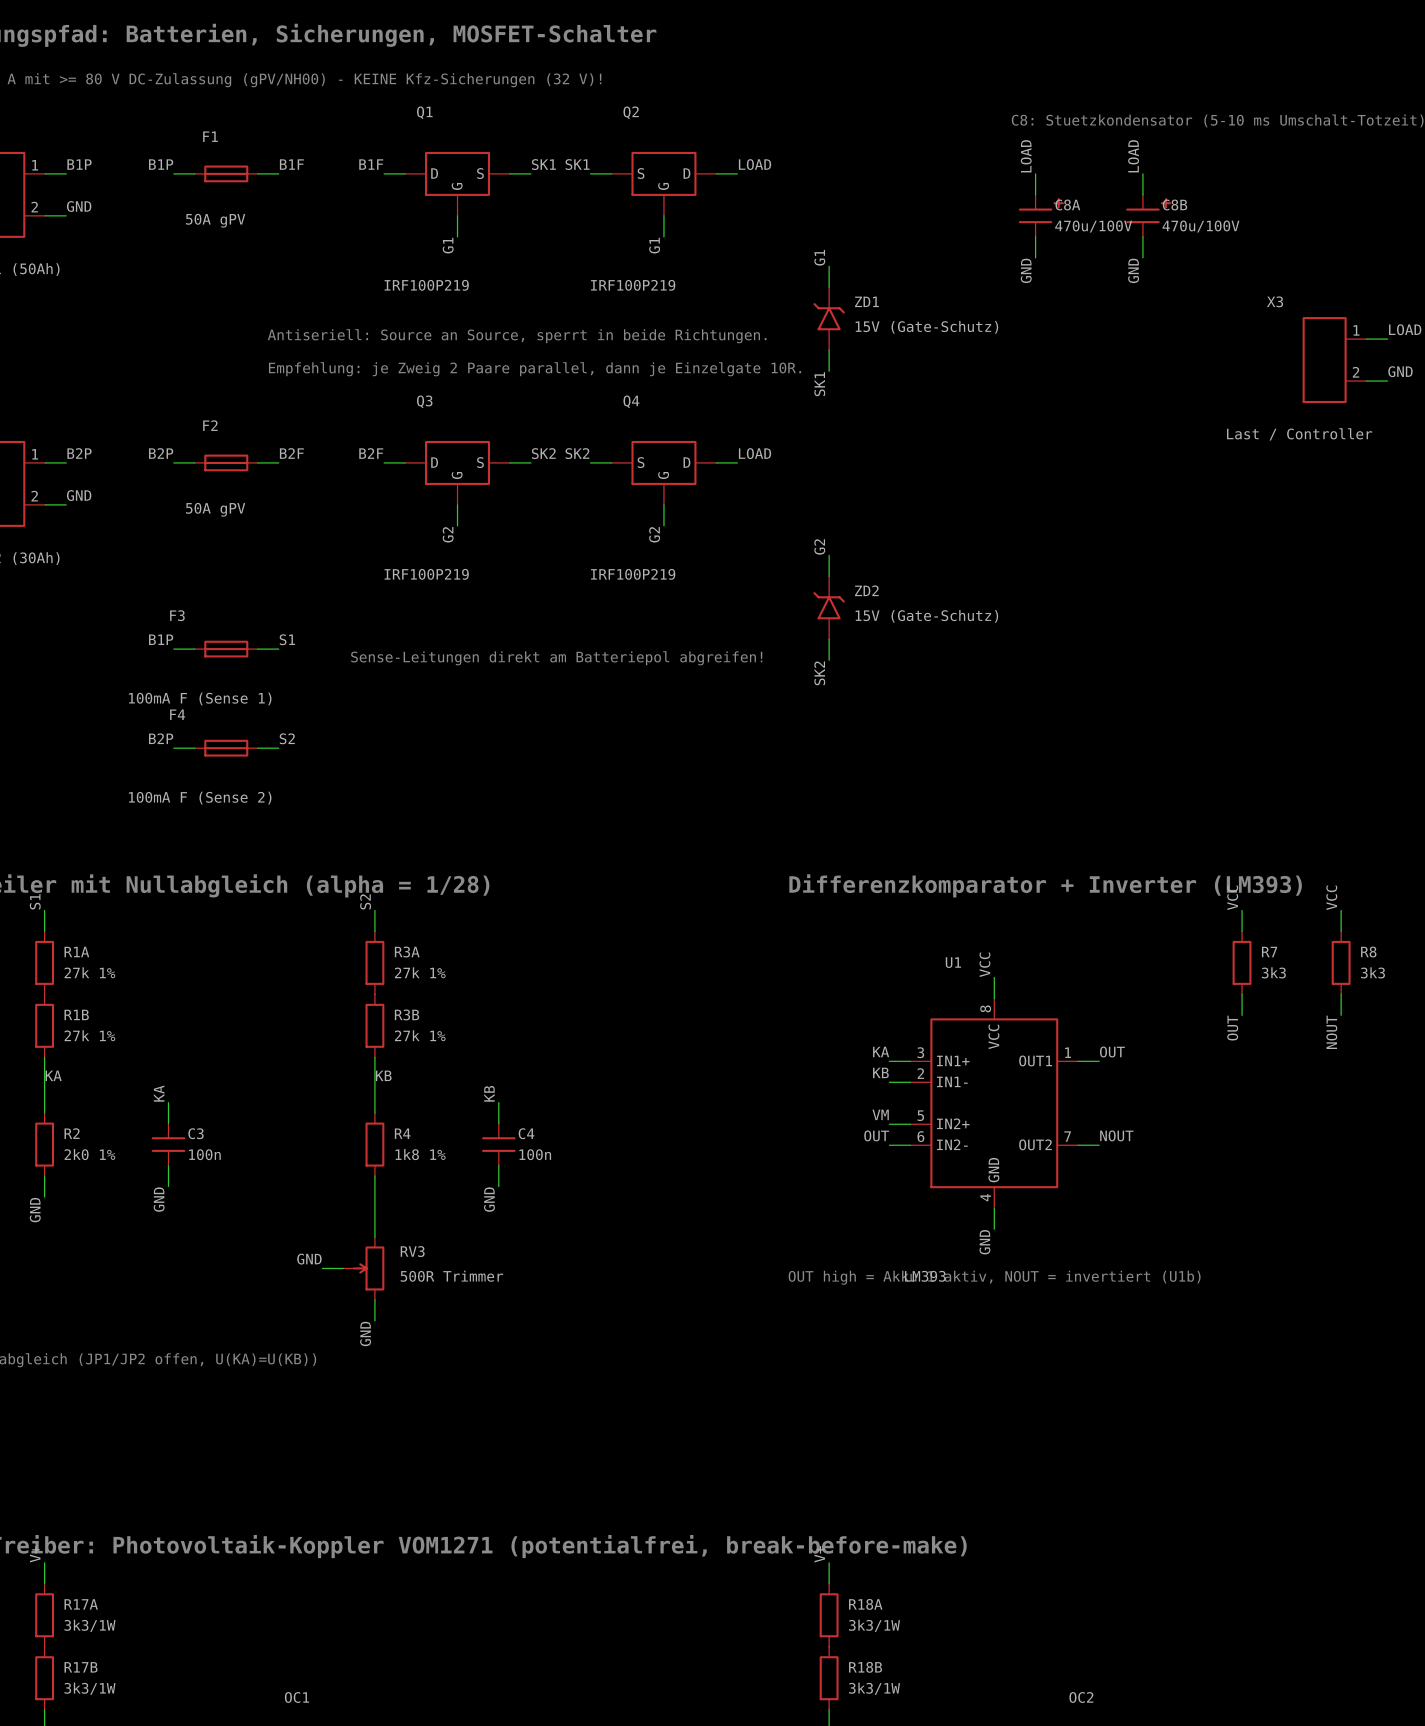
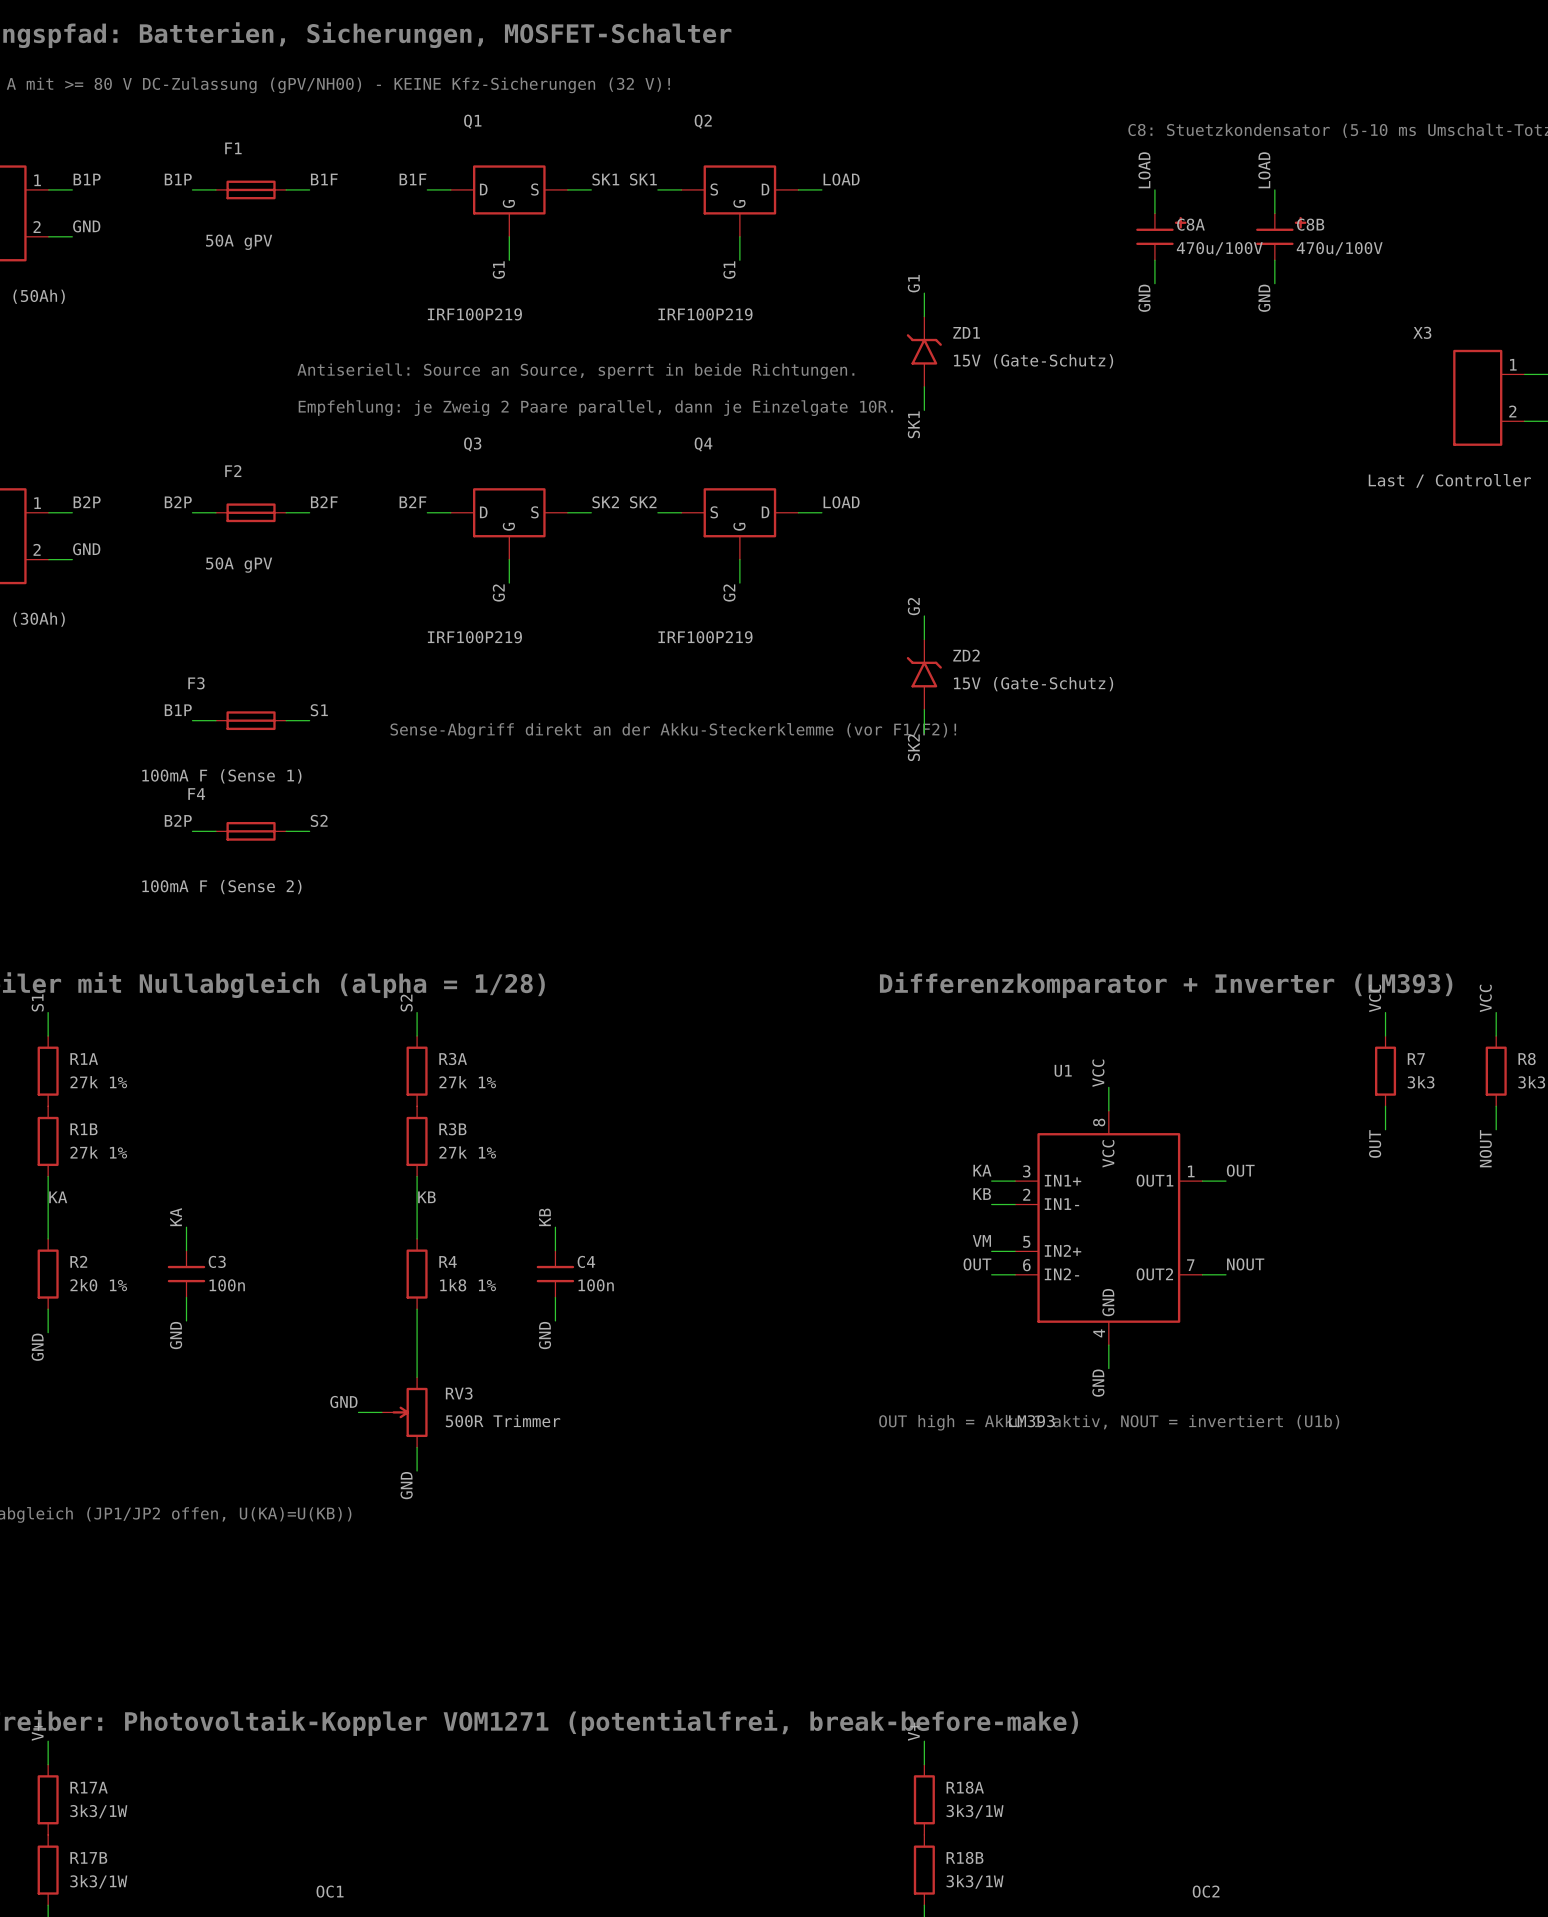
text: Sense-Leitungen direkt am Batteriepol abgreifen! (556, 658) -> Sense-Abgriff direkt an der Akku-Steckerklemme (vor F1/F2)! (673, 730)

